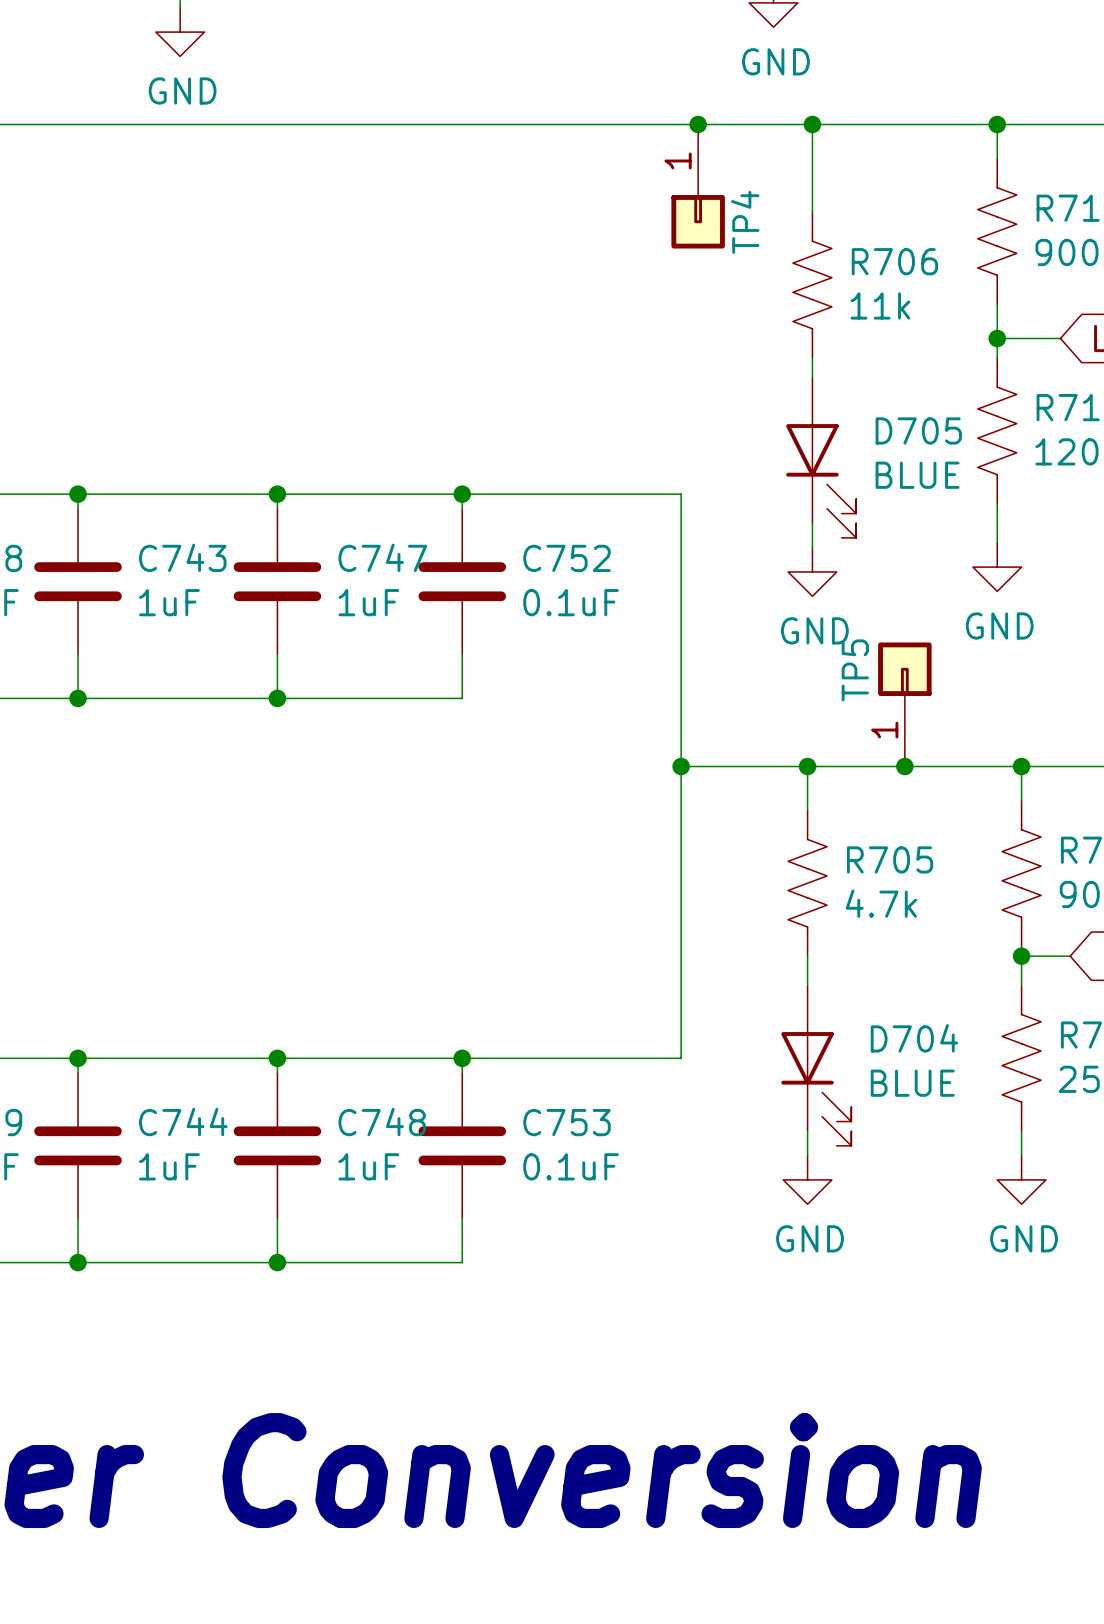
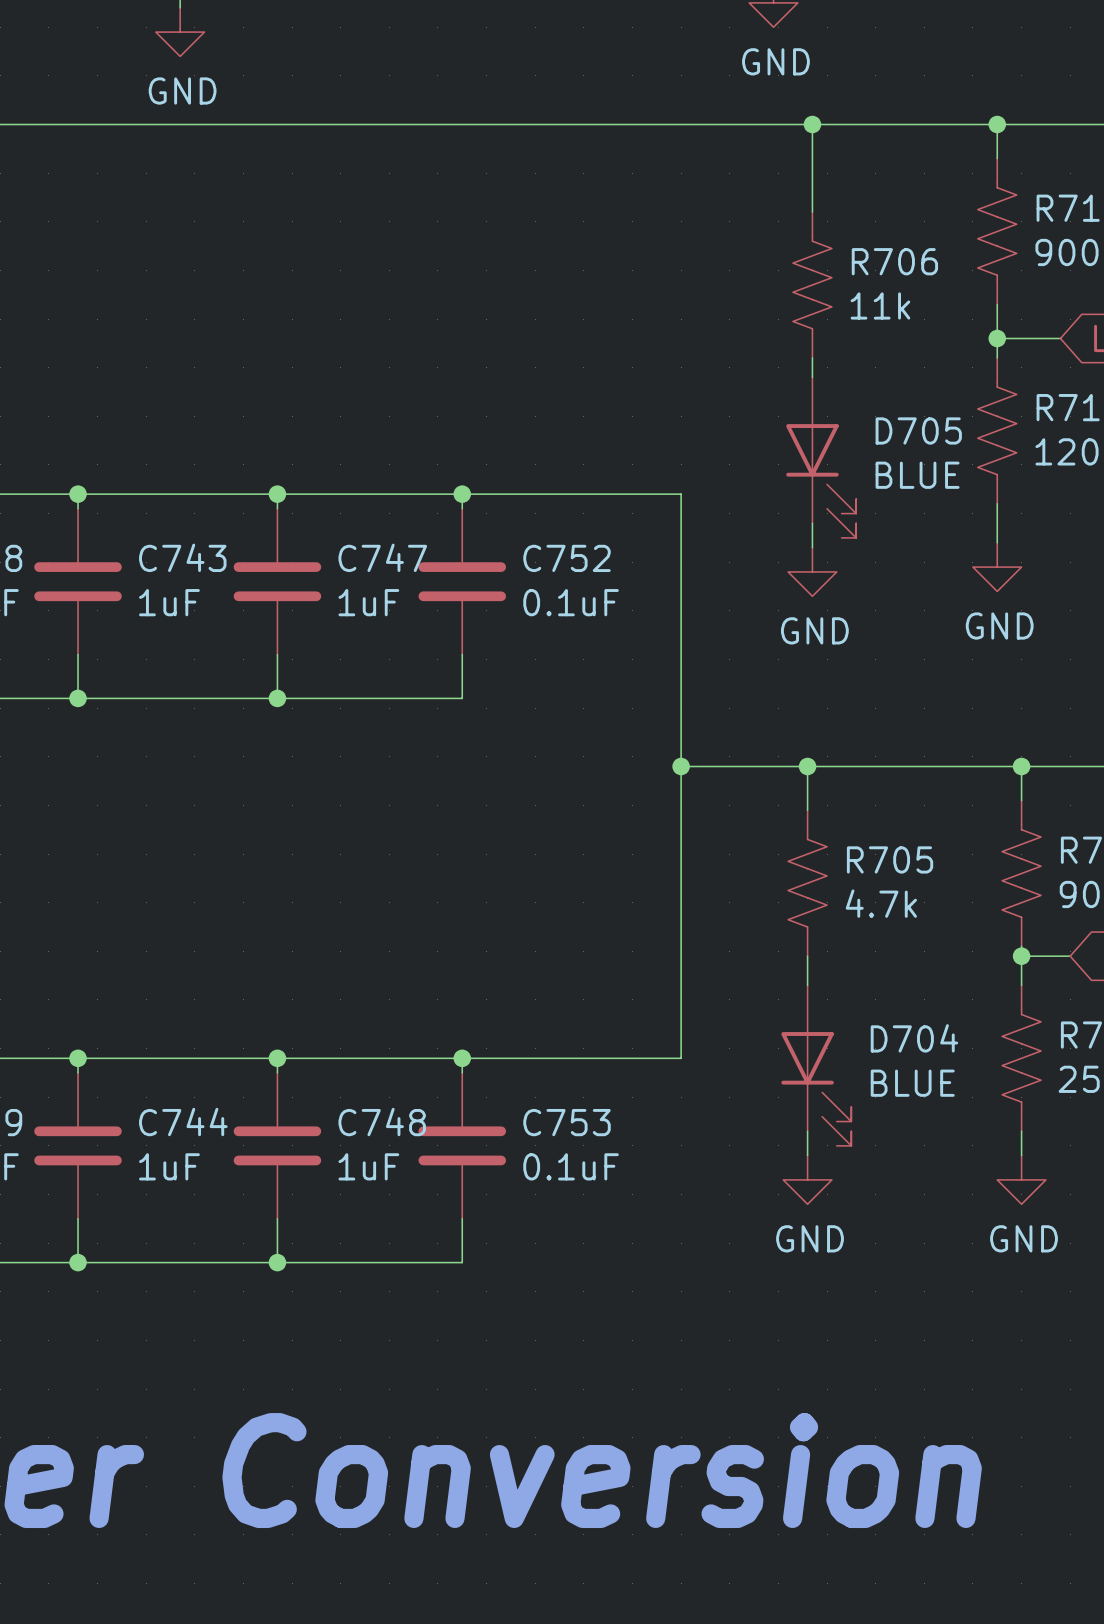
junction: (698, 124) -> none
TP4: (698, 186) -> none
TP5: (904, 704) -> none
junction: (904, 766) -> none

